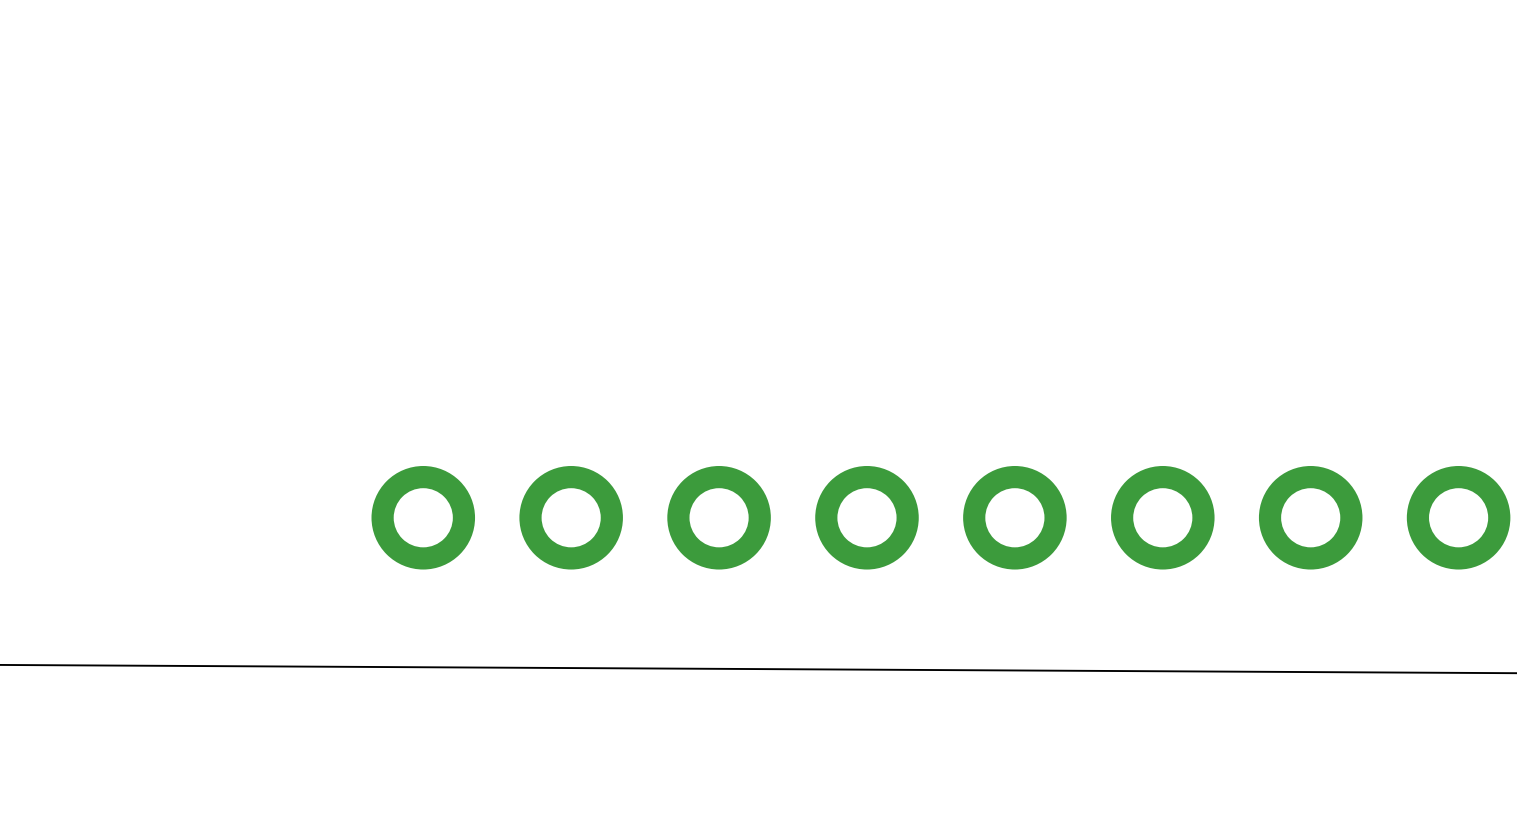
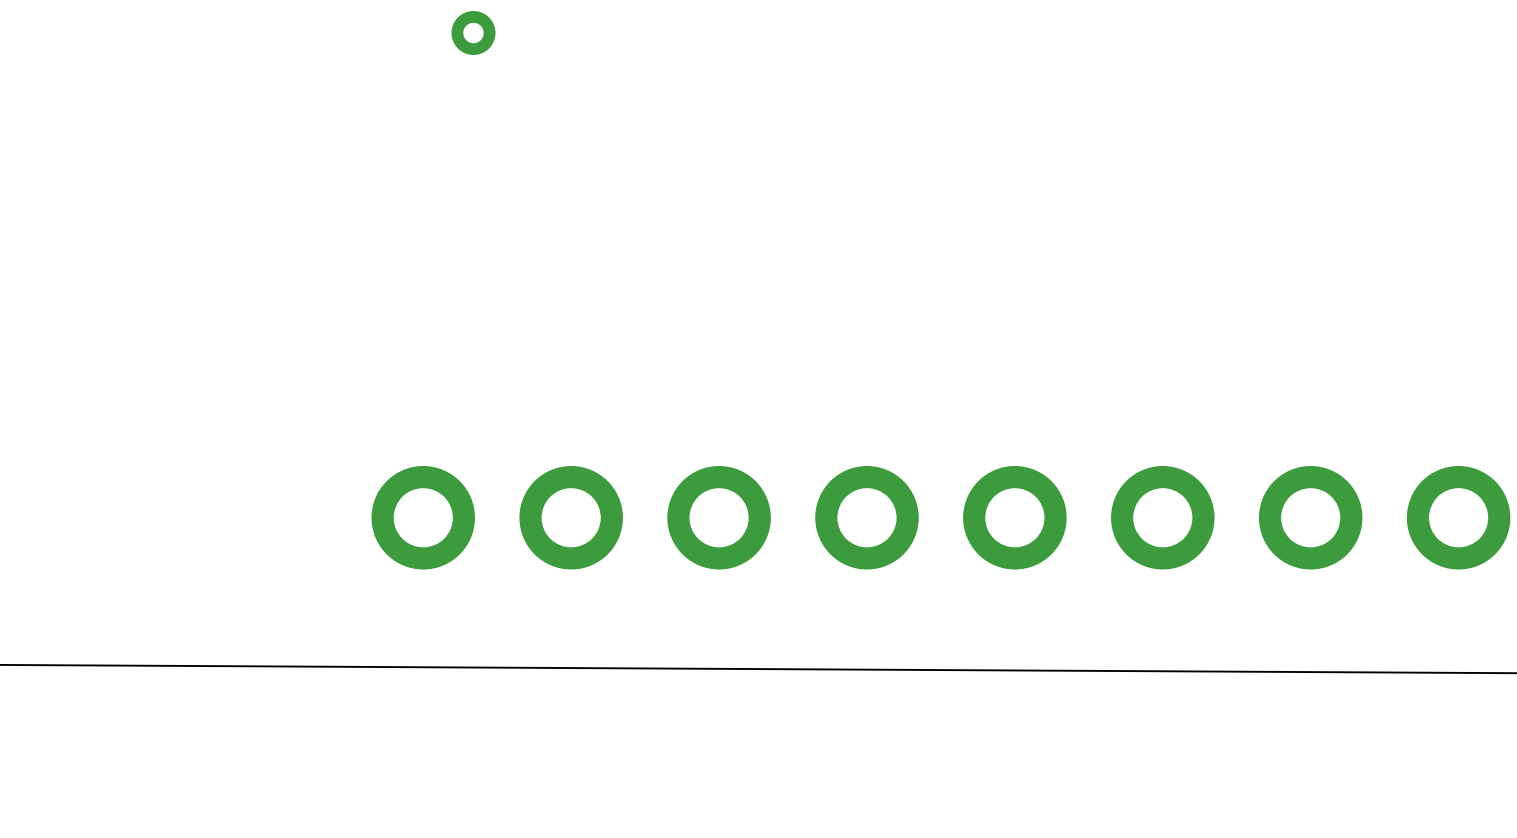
via: none -> (473, 32)

